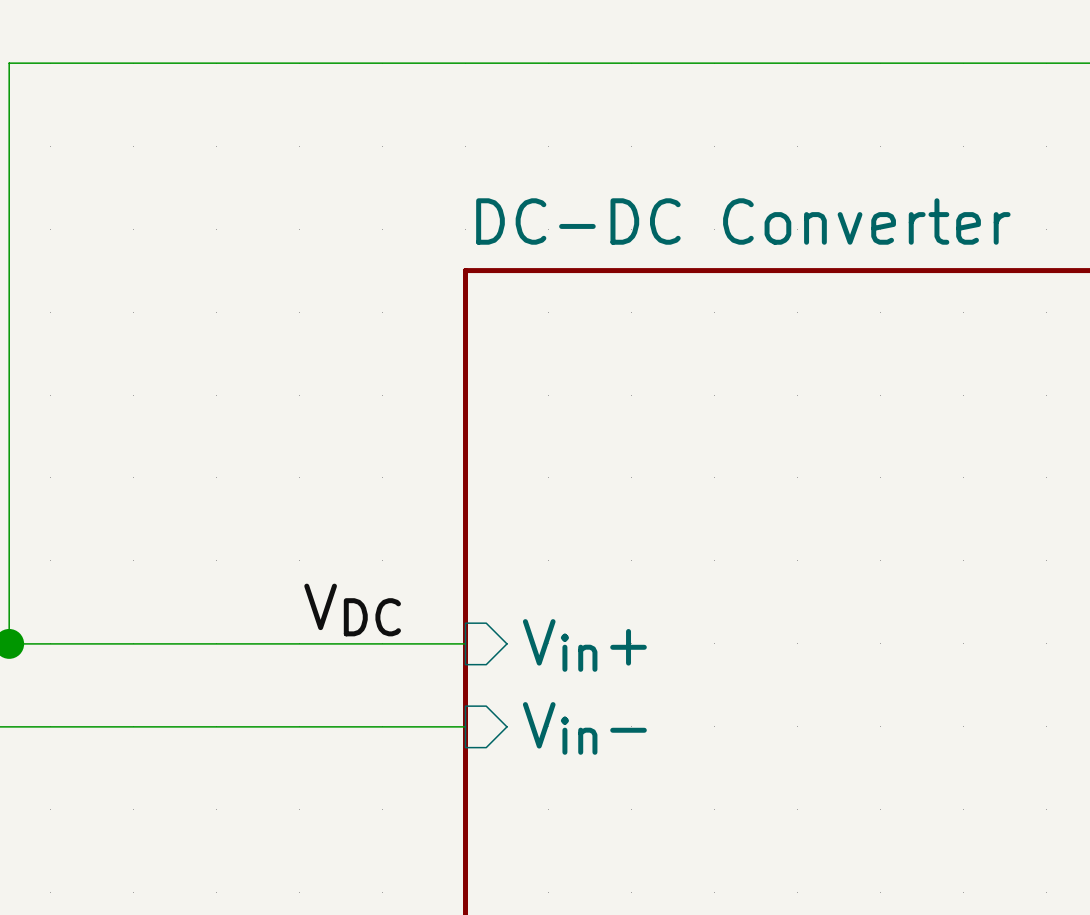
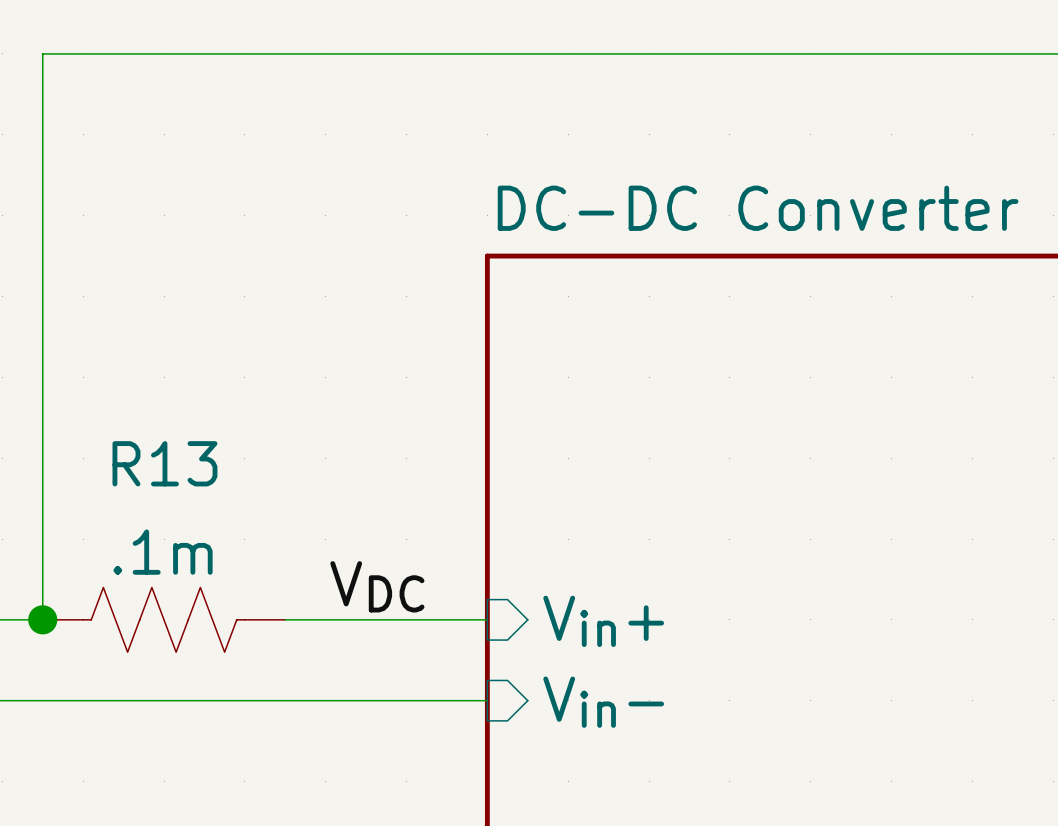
wire: (9, 643) (258, 643) -> none
R13: none -> .1m (164, 619)

